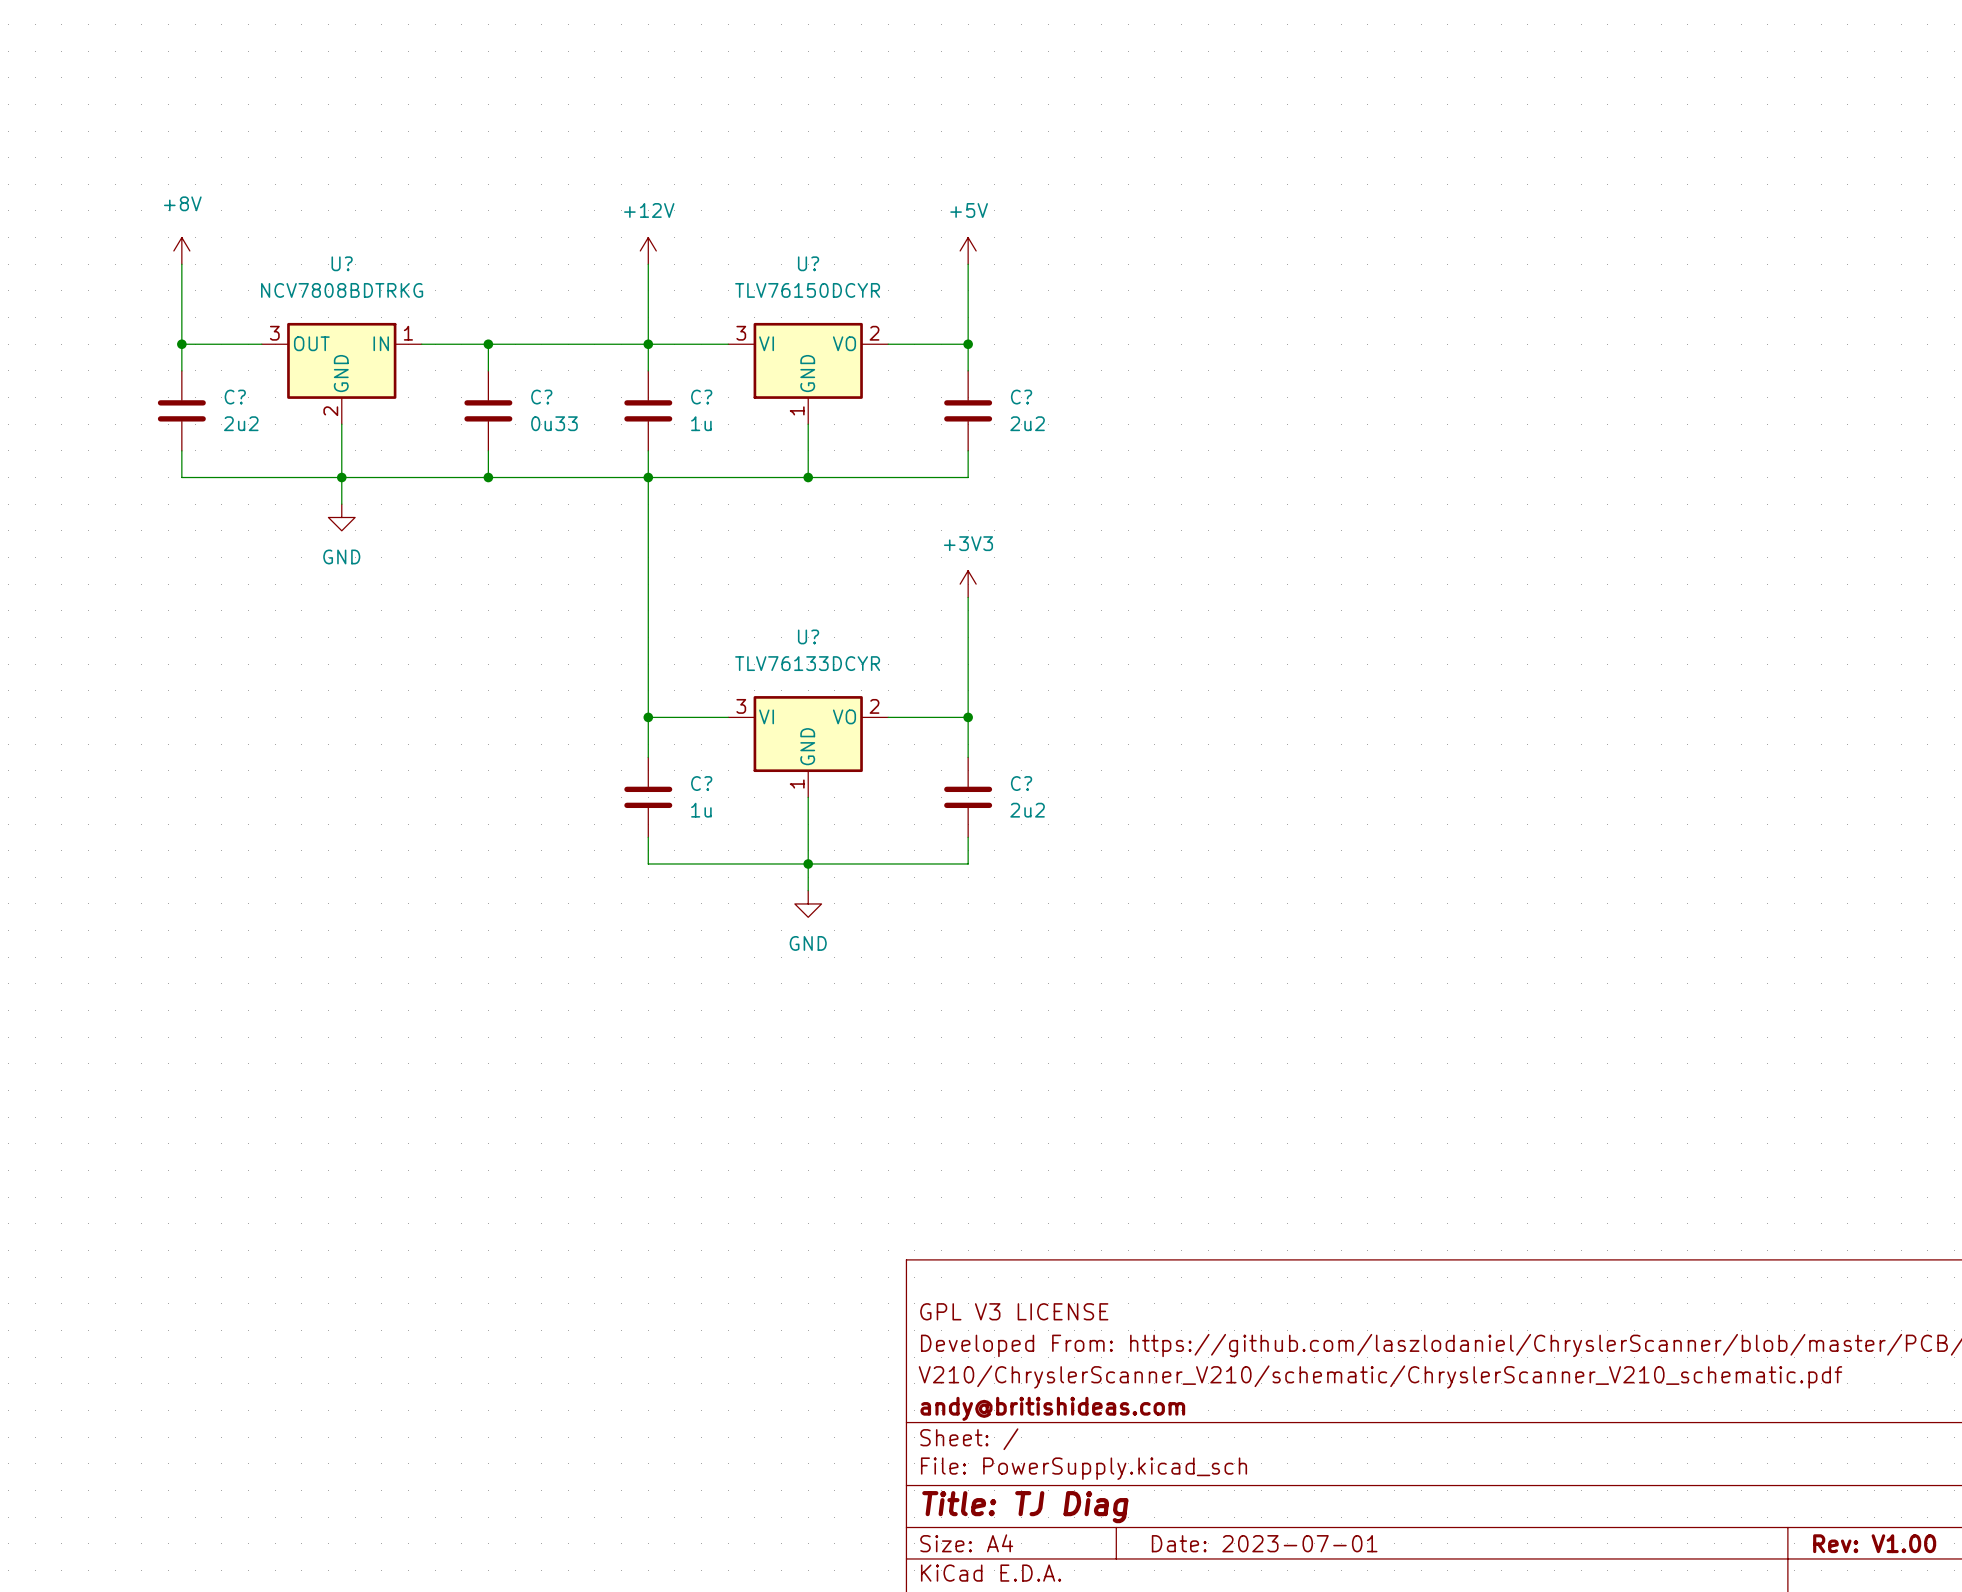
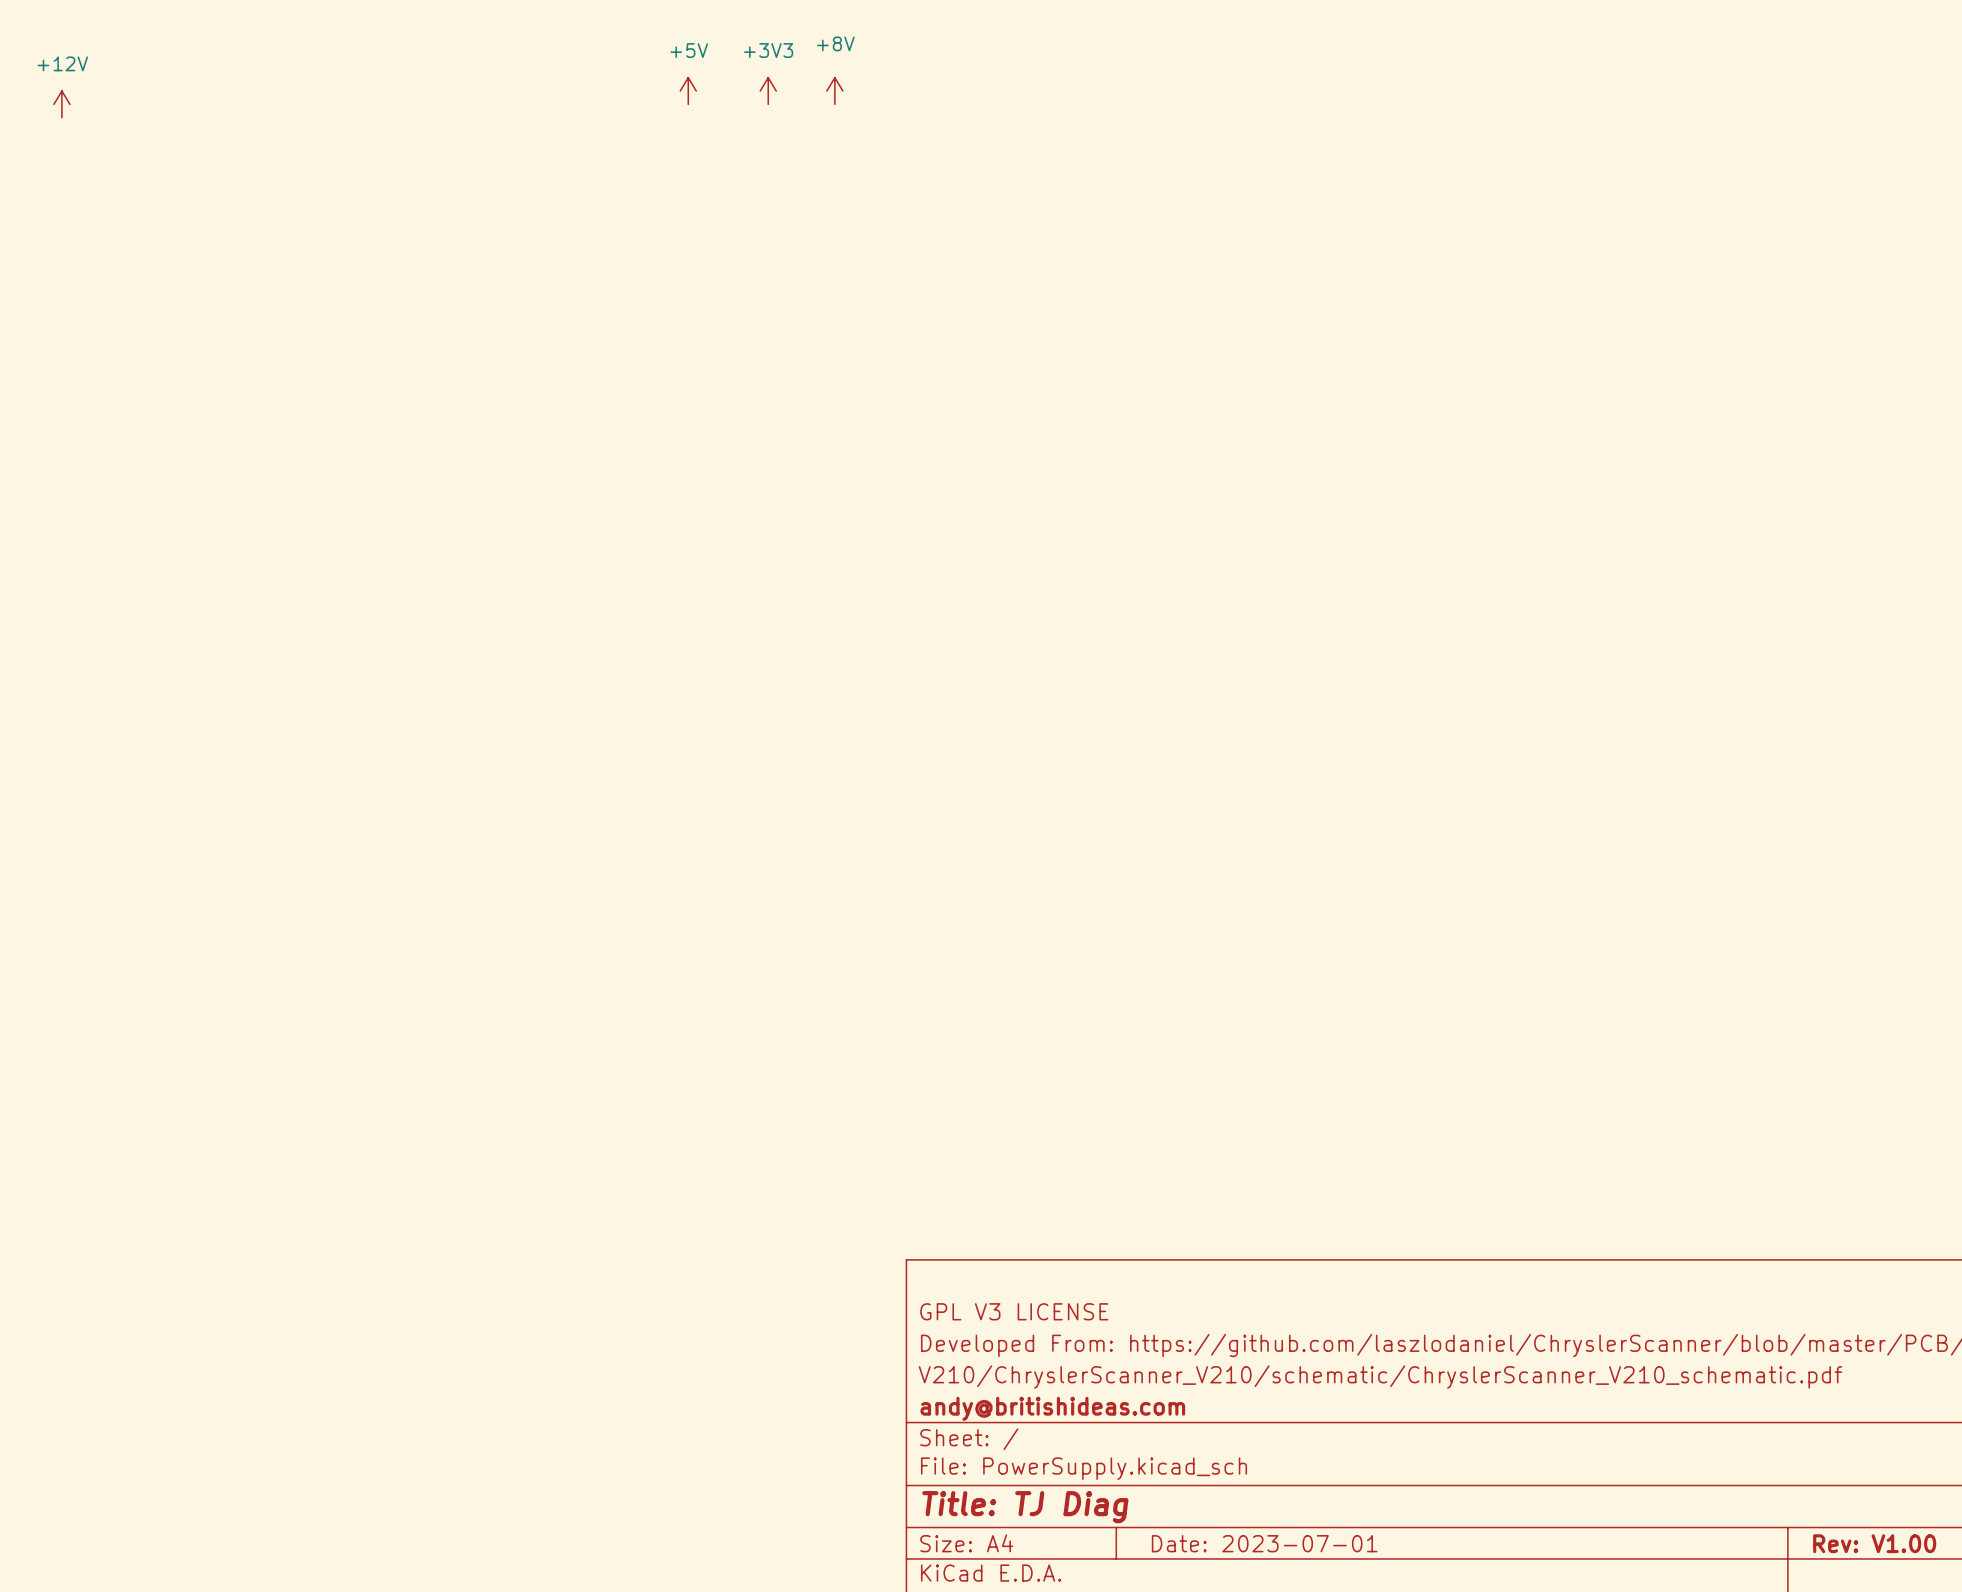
power symbol: none -> +5V (688, 91)
power symbol: none -> +3V3 (768, 91)
power symbol: none -> +8V (834, 91)
power symbol: none -> +12V (61, 104)
power symbol: +8V (181, 250) -> none
power symbol: +12V (648, 250) -> none
power symbol: +5V (968, 250) -> none
wire: (181, 264) (181, 370) -> none
wire: (648, 264) (648, 370) -> none
wire: (968, 264) (968, 370) -> none
wire: (181, 344) (261, 344) -> none
junction: (181, 344) -> none
wire: (421, 344) (728, 344) -> none
wire: (488, 344) (488, 370) -> none
junction: (488, 344) -> none
junction: (648, 344) -> none
wire: (888, 344) (968, 344) -> none
junction: (968, 344) -> none
U?: NCV7808BDTRKG (341, 373) -> none
U?: TLV76150DCYR (808, 373) -> none
C?: 2u2 (181, 410) -> none
C?: 0u33 (488, 410) -> none
C?: 1u (648, 410) -> none
C?: 2u2 (968, 410) -> none
wire: (341, 424) (341, 504) -> none
wire: (808, 424) (808, 477) -> none
wire: (181, 450) (181, 477) (968, 477) (968, 450) -> none
wire: (488, 450) (488, 477) -> none
wire: (648, 450) (648, 757) -> none
junction: (341, 477) -> none
junction: (488, 477) -> none
junction: (648, 477) -> none
junction: (808, 477) -> none
power symbol: GND (341, 517) -> none
power symbol: +3V3 (968, 584) -> none
wire: (968, 597) (968, 757) -> none
wire: (648, 717) (728, 717) -> none
junction: (648, 717) -> none
wire: (888, 717) (968, 717) -> none
junction: (968, 717) -> none
U?: TLV76133DCYR (808, 746) -> none
C?: 1u (648, 797) -> none
wire: (808, 797) (808, 890) -> none
C?: 2u2 (968, 797) -> none
wire: (648, 837) (648, 863) (968, 863) (968, 837) -> none
junction: (808, 863) -> none
power symbol: GND (808, 903) -> none

